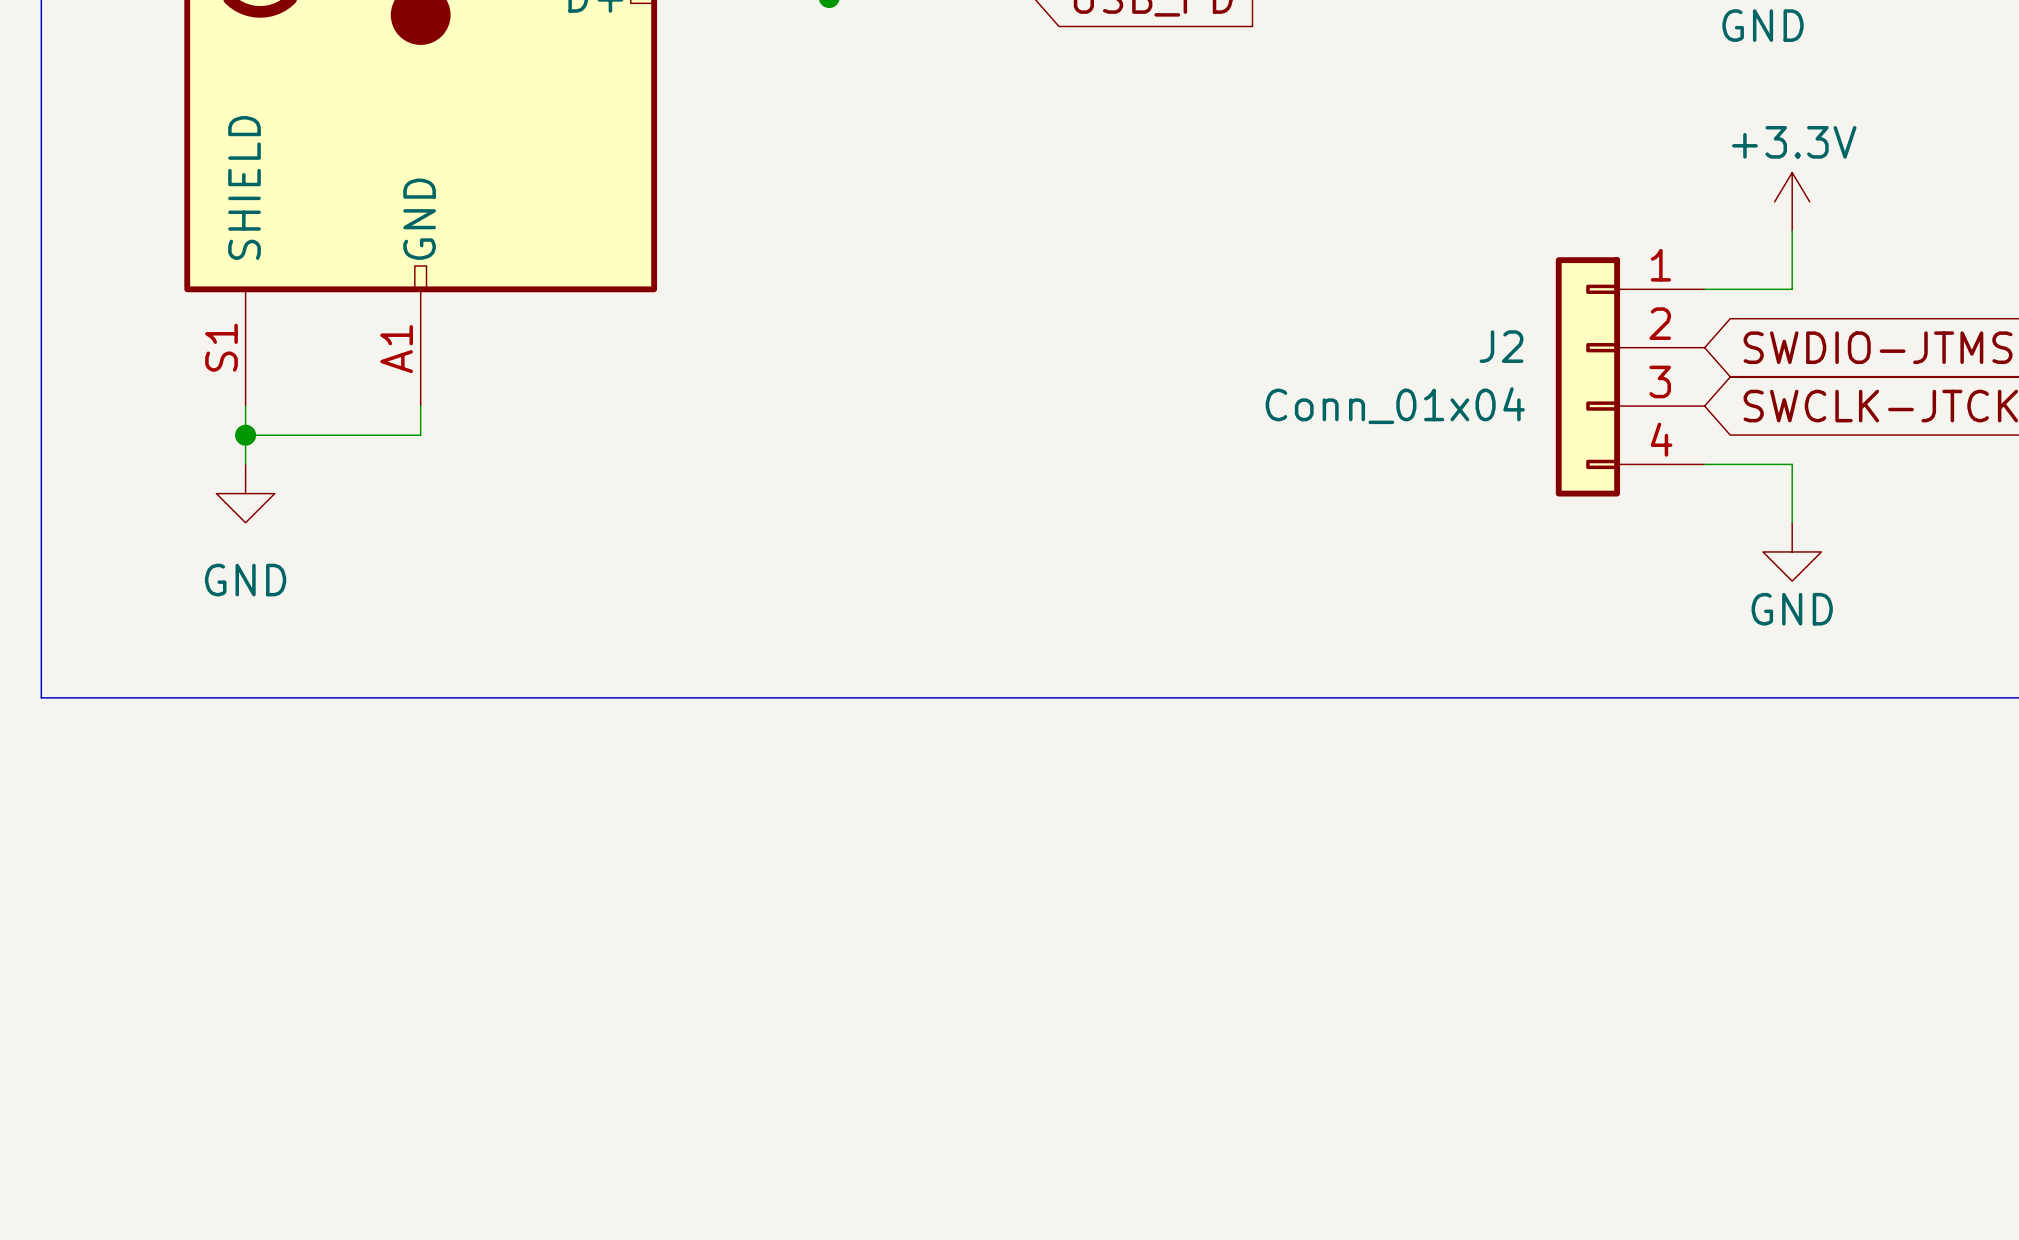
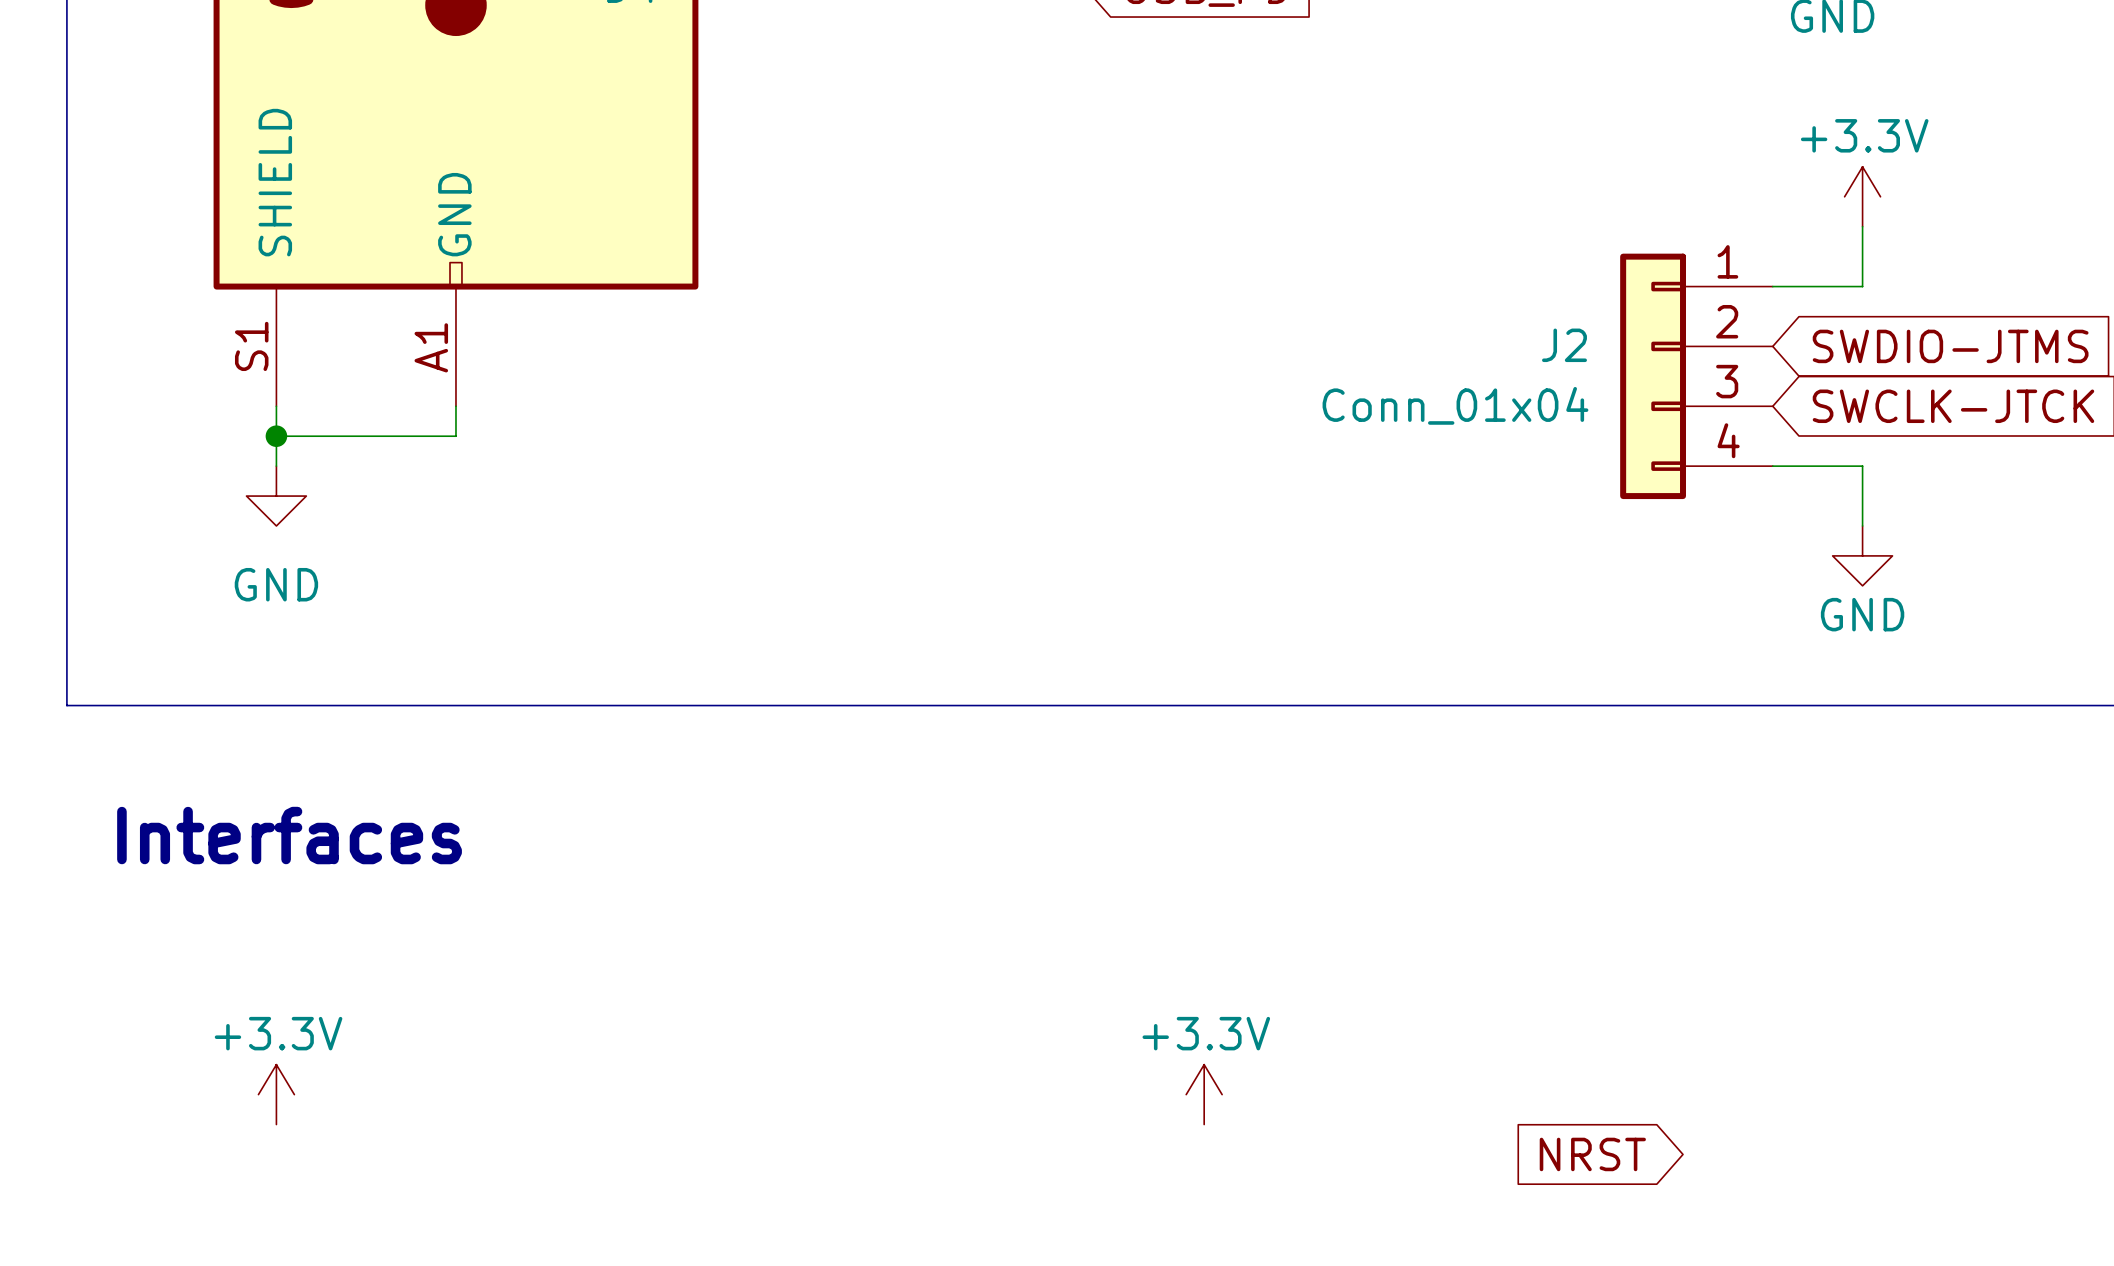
text: none -> Interfaces (289, 835)
power symbol: none -> +3.3V (276, 1094)
power symbol: none -> +3.3V (1204, 1094)
global label: none -> NRST (1592, 1154)

